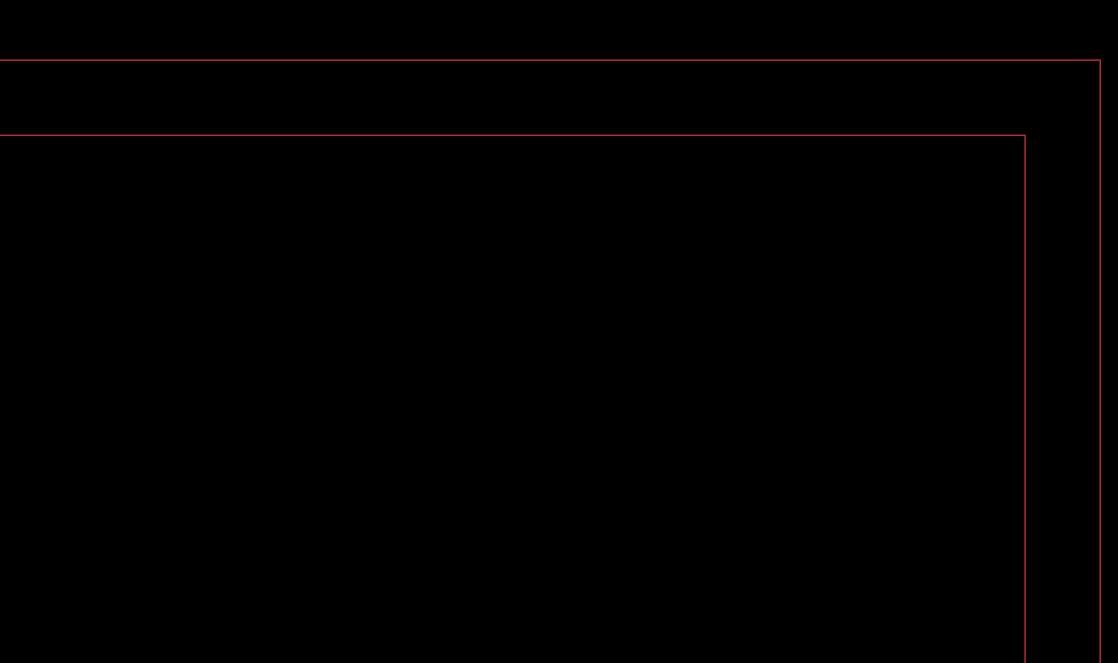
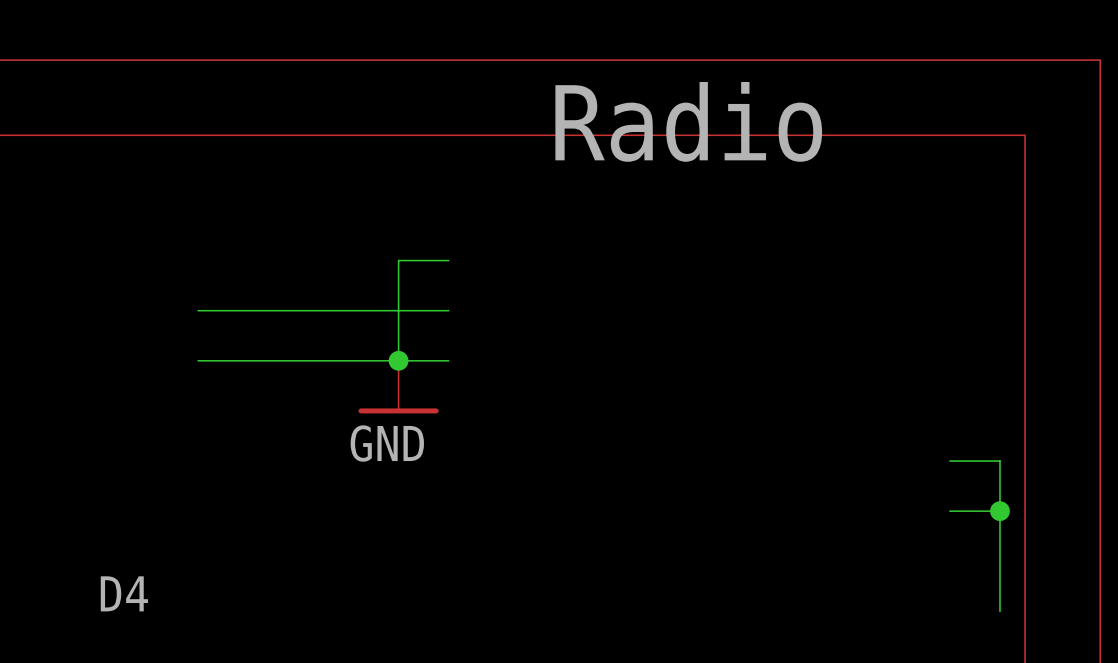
text: none -> Radio (688, 121)
wire: none -> (448, 260) (398, 260) (398, 360)
wire: none -> (198, 310) (448, 310)
wire: none -> (198, 360) (448, 360)
junction: none -> (398, 360)
power symbol: none -> GND (398, 387)
wire: none -> (949, 461) (999, 461) (999, 611)
wire: none -> (949, 511) (999, 511)
junction: none -> (999, 511)
label: none -> D4 (124, 593)

